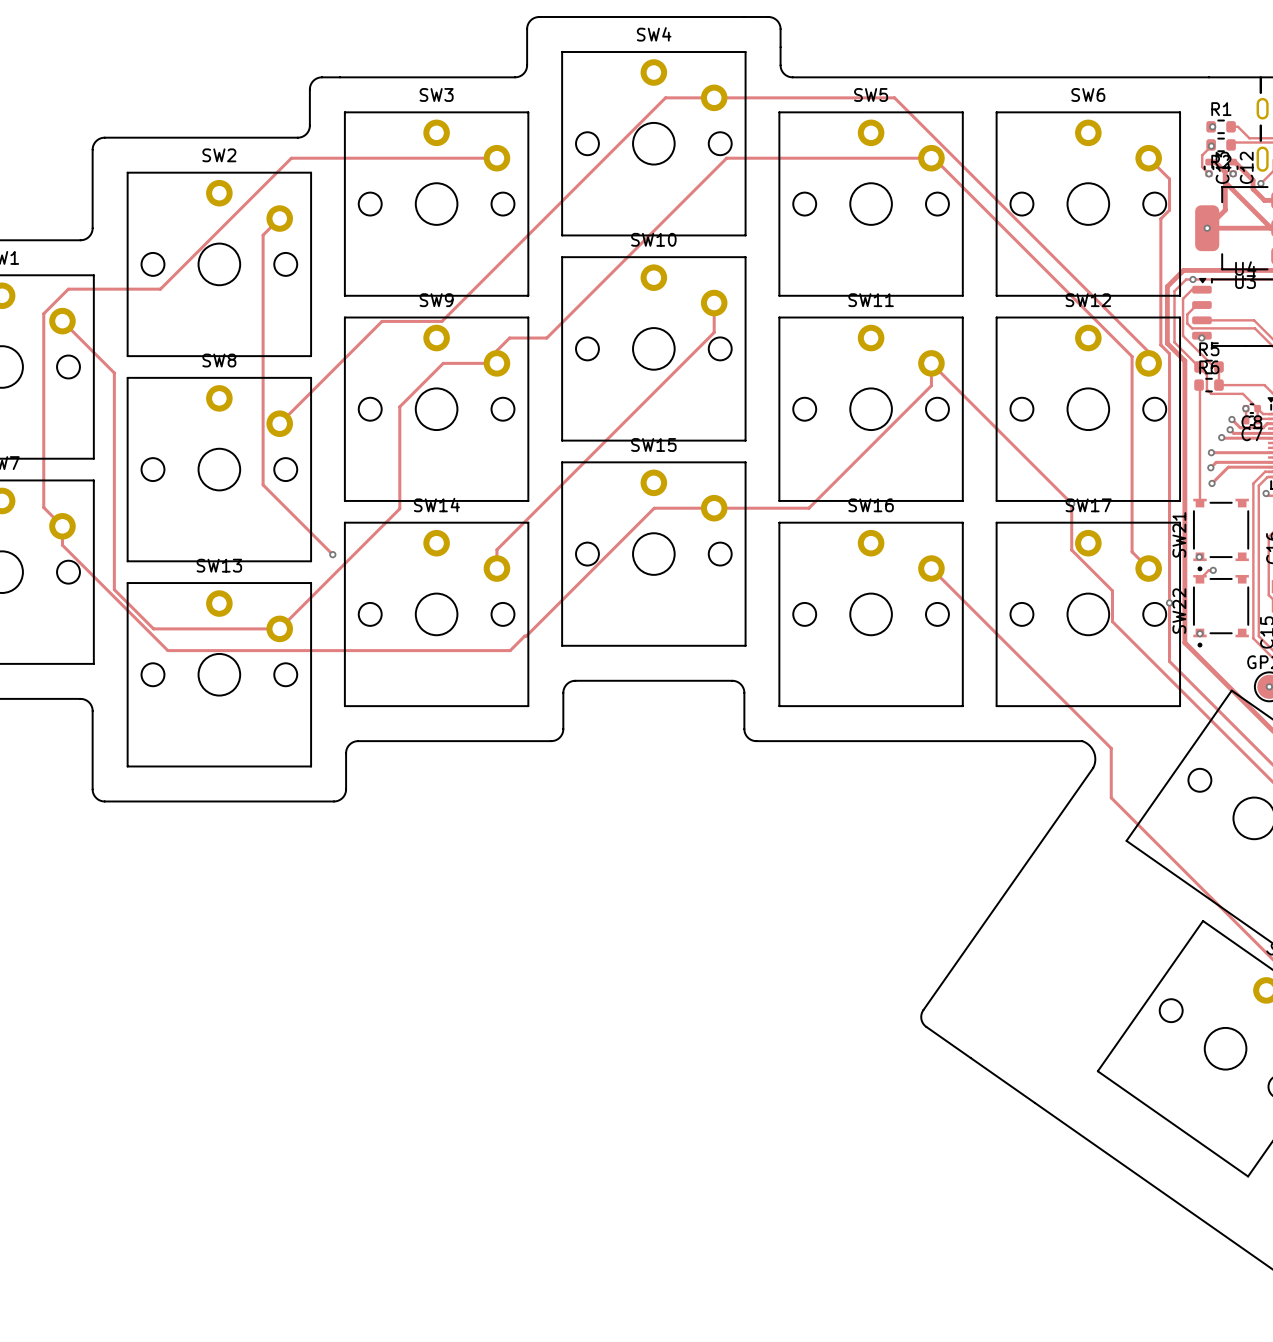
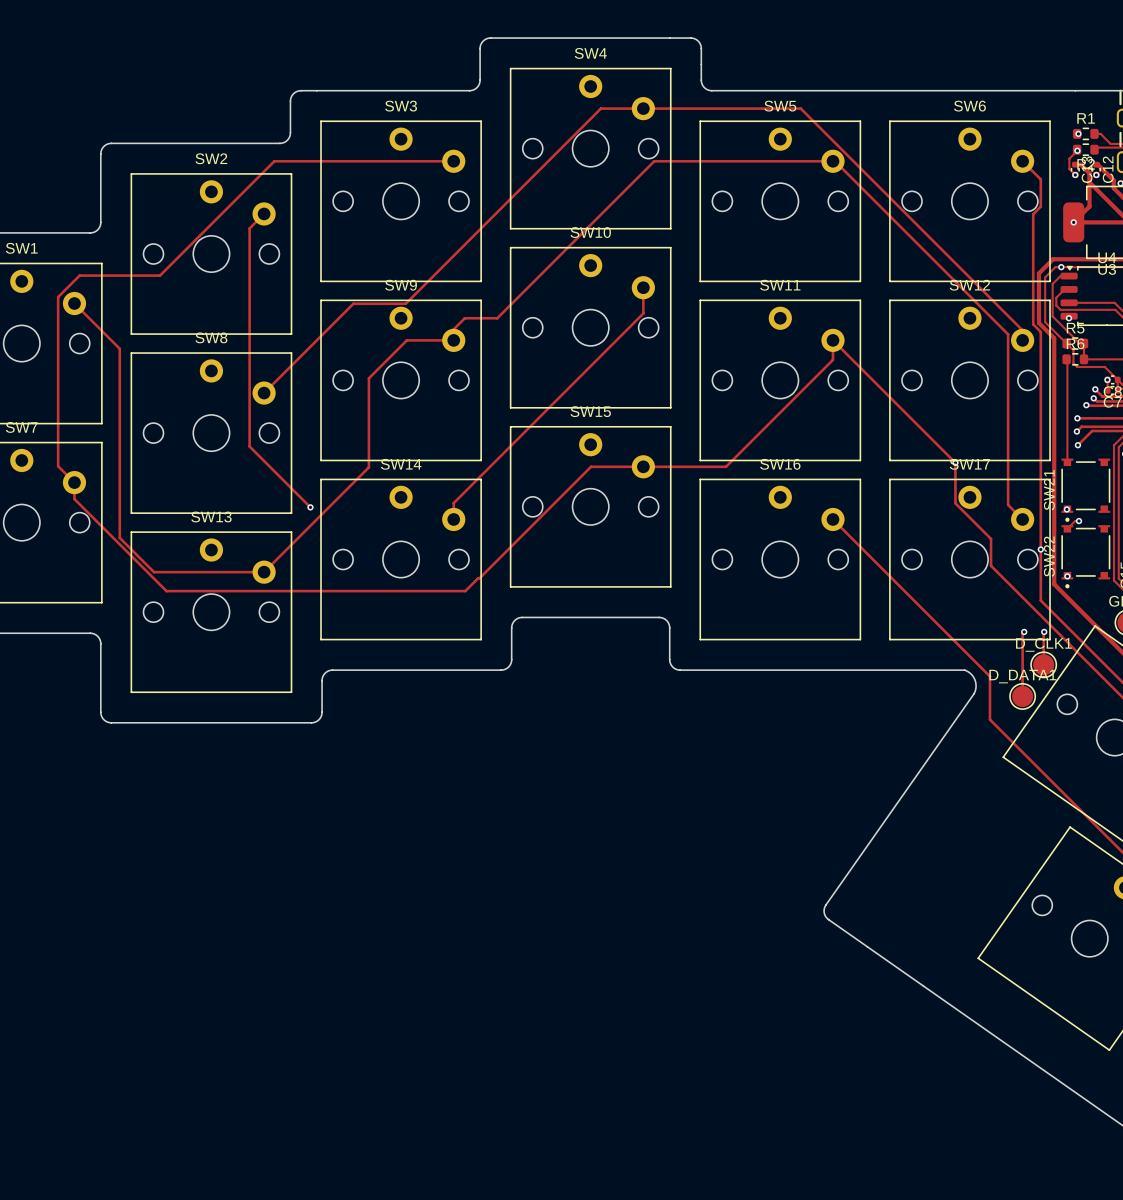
track: none -> (1024, 631) (1022, 633) (1022, 696)
via: none -> (1024, 631)
track: none -> (1044, 631) (1043, 664)
via: none -> (1044, 631)
D_CLK1: none -> (1043, 664)
D_DATA1: none -> (1022, 696)

